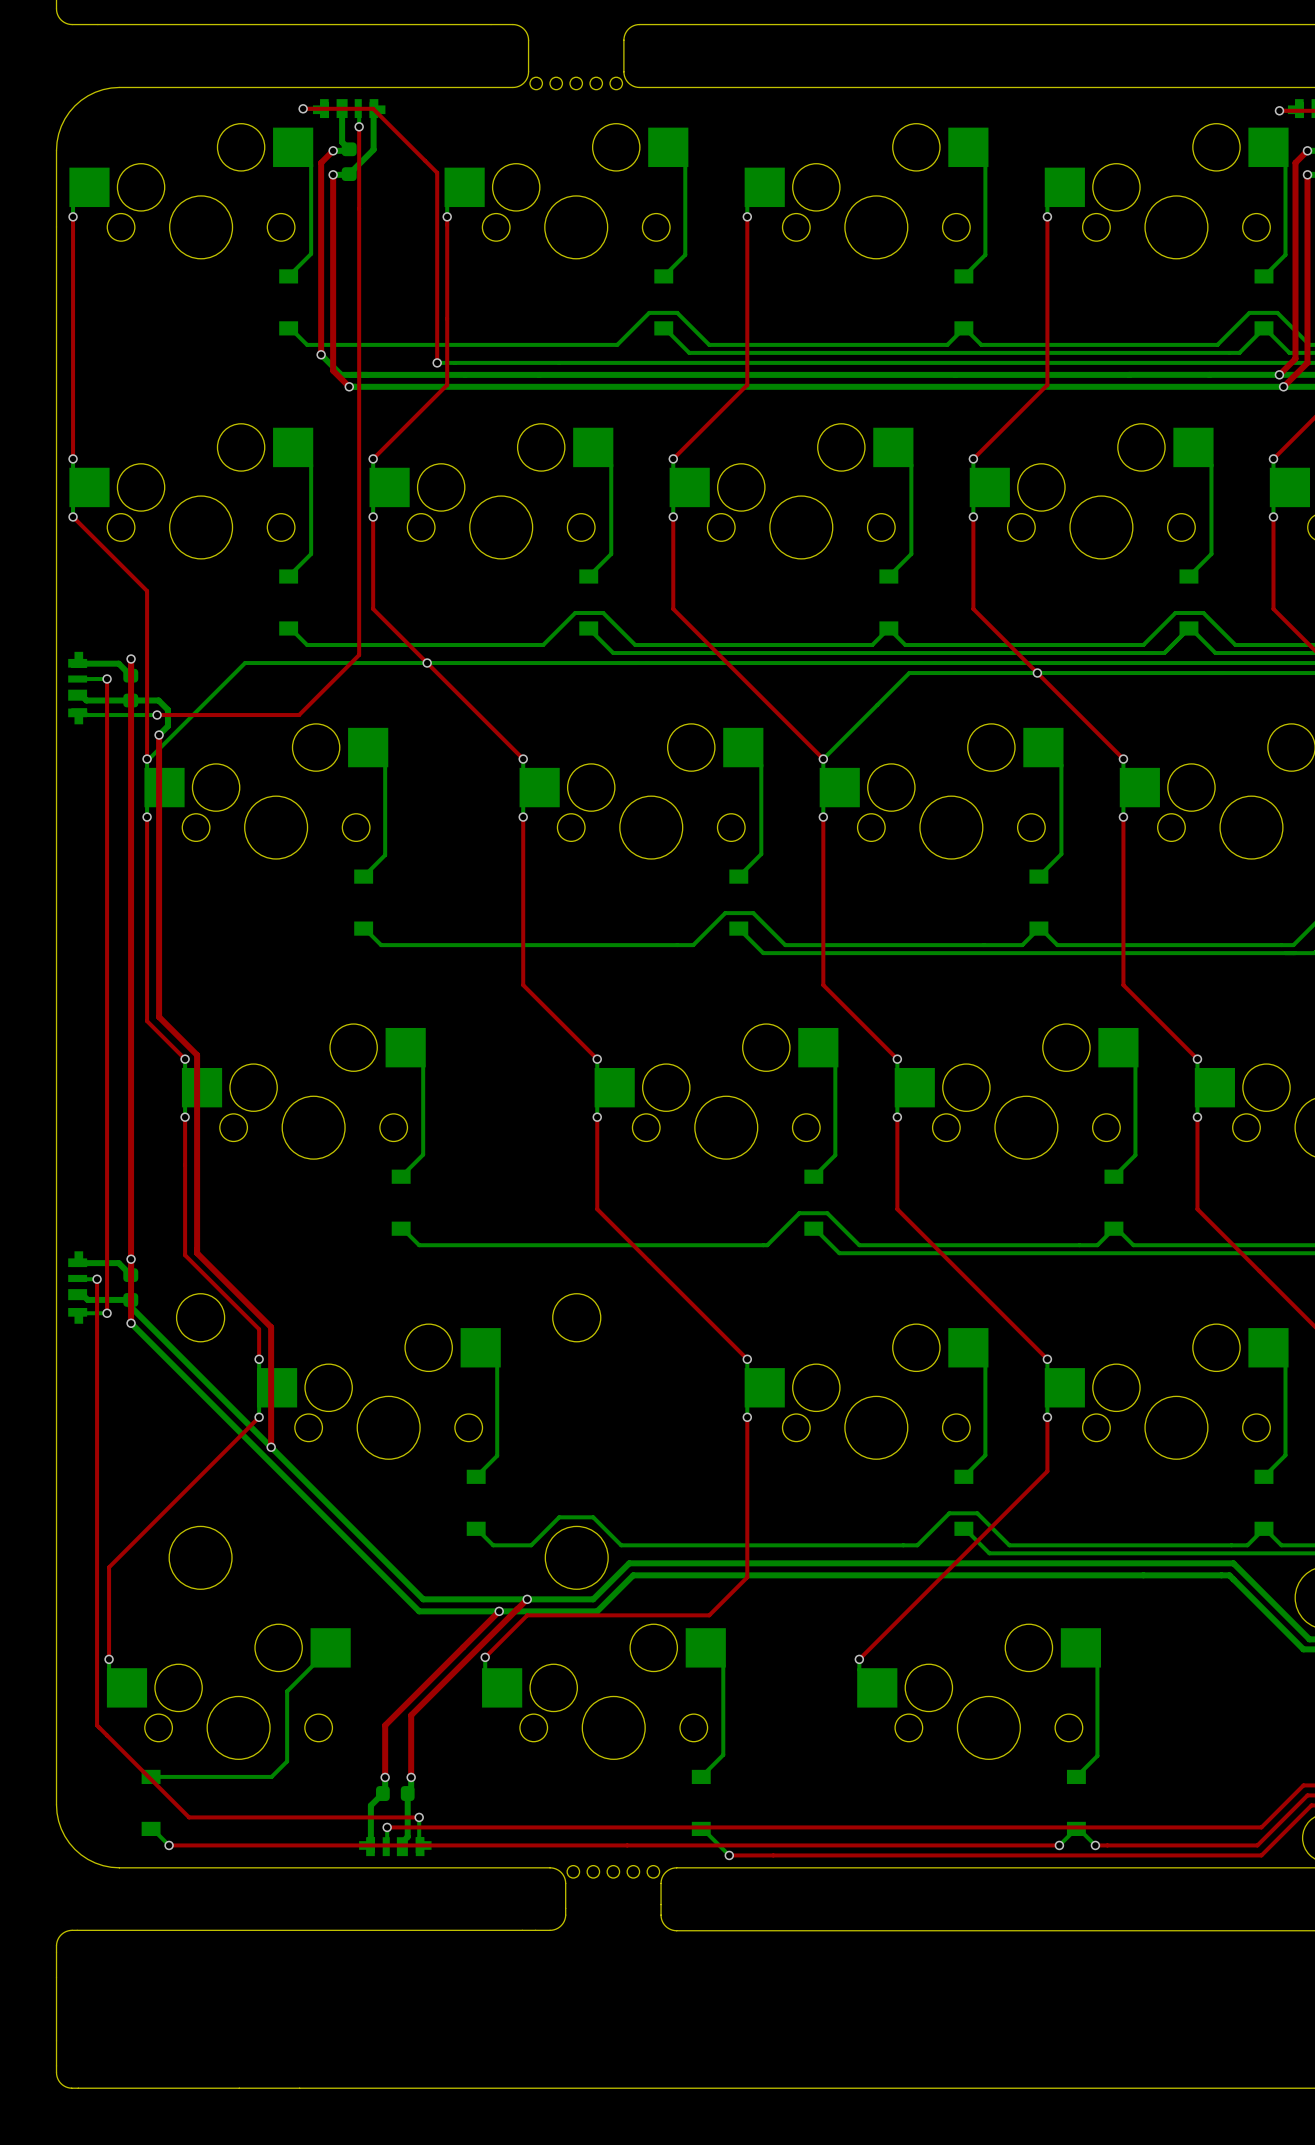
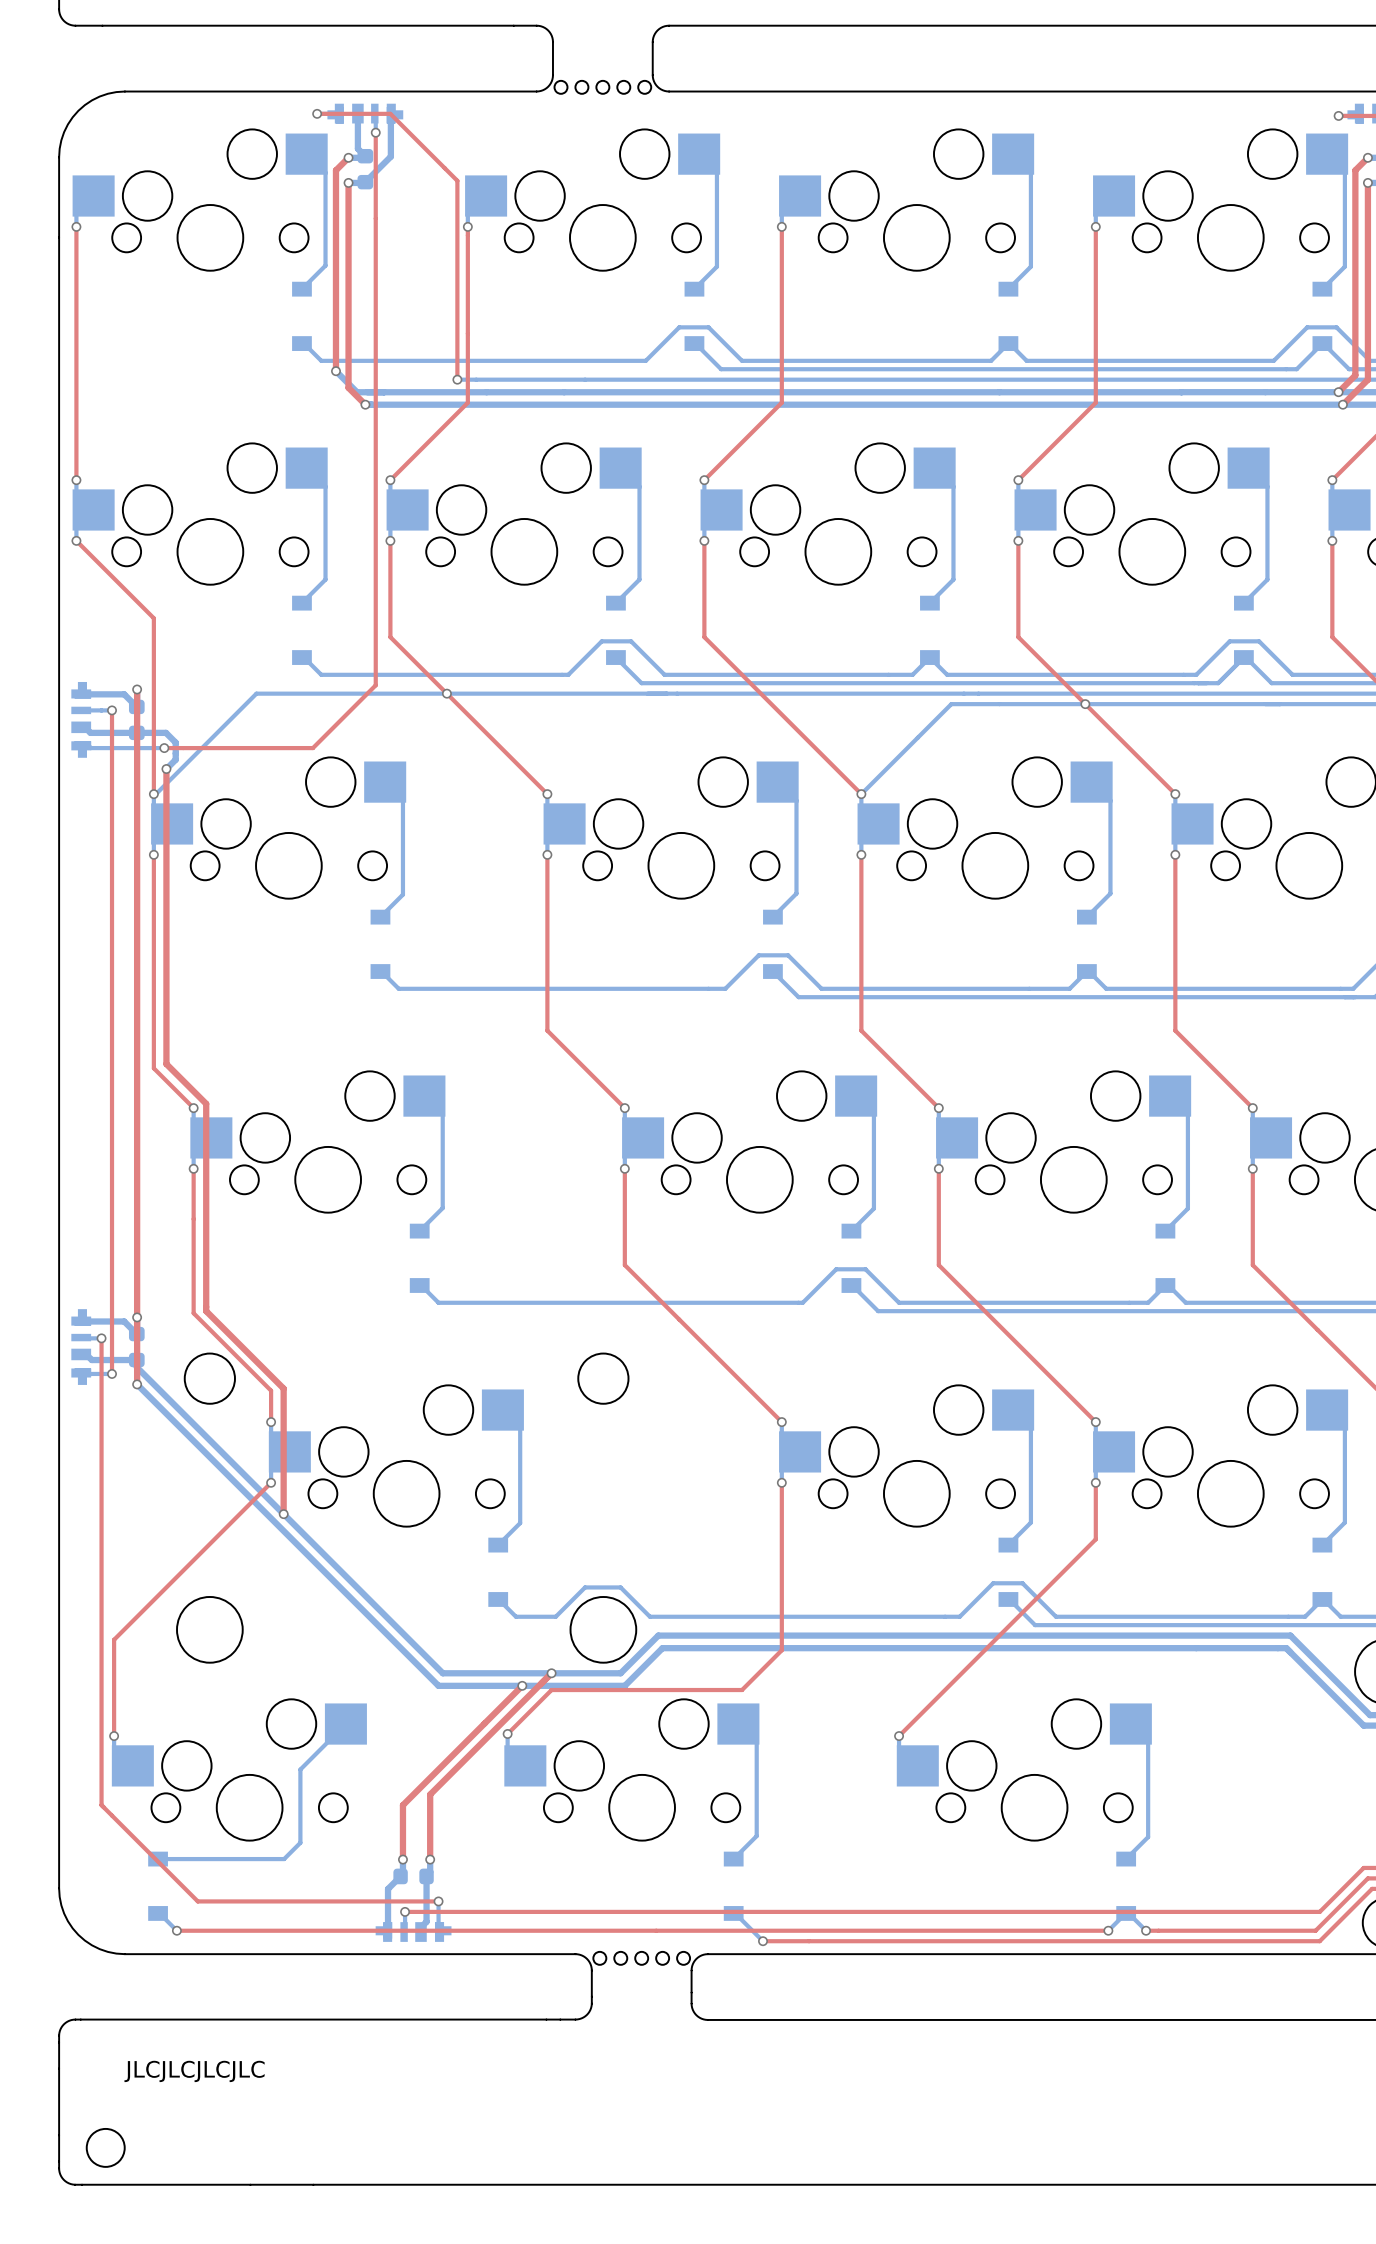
text: none -> JLCJLCJLCJLC (194, 2071)
round board edge: none -> [86, 2128, 126, 2168]

